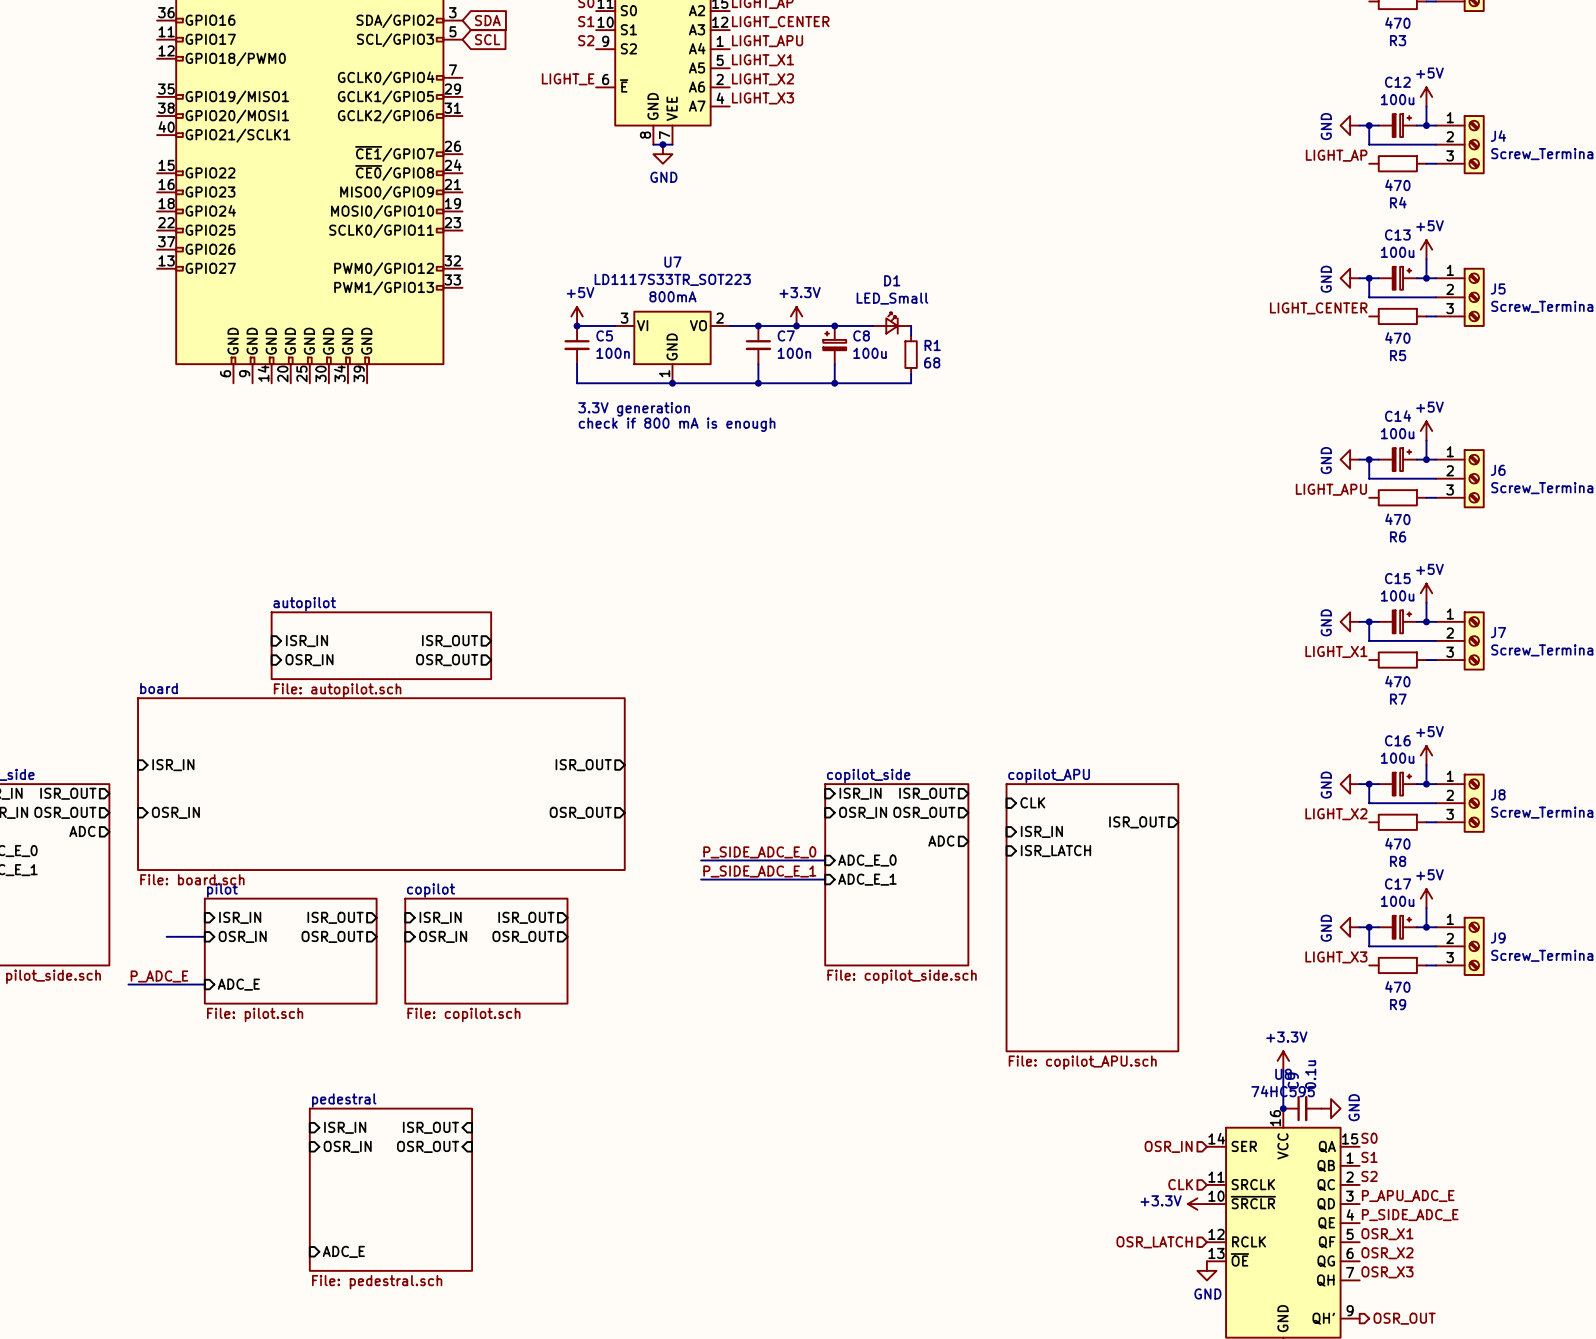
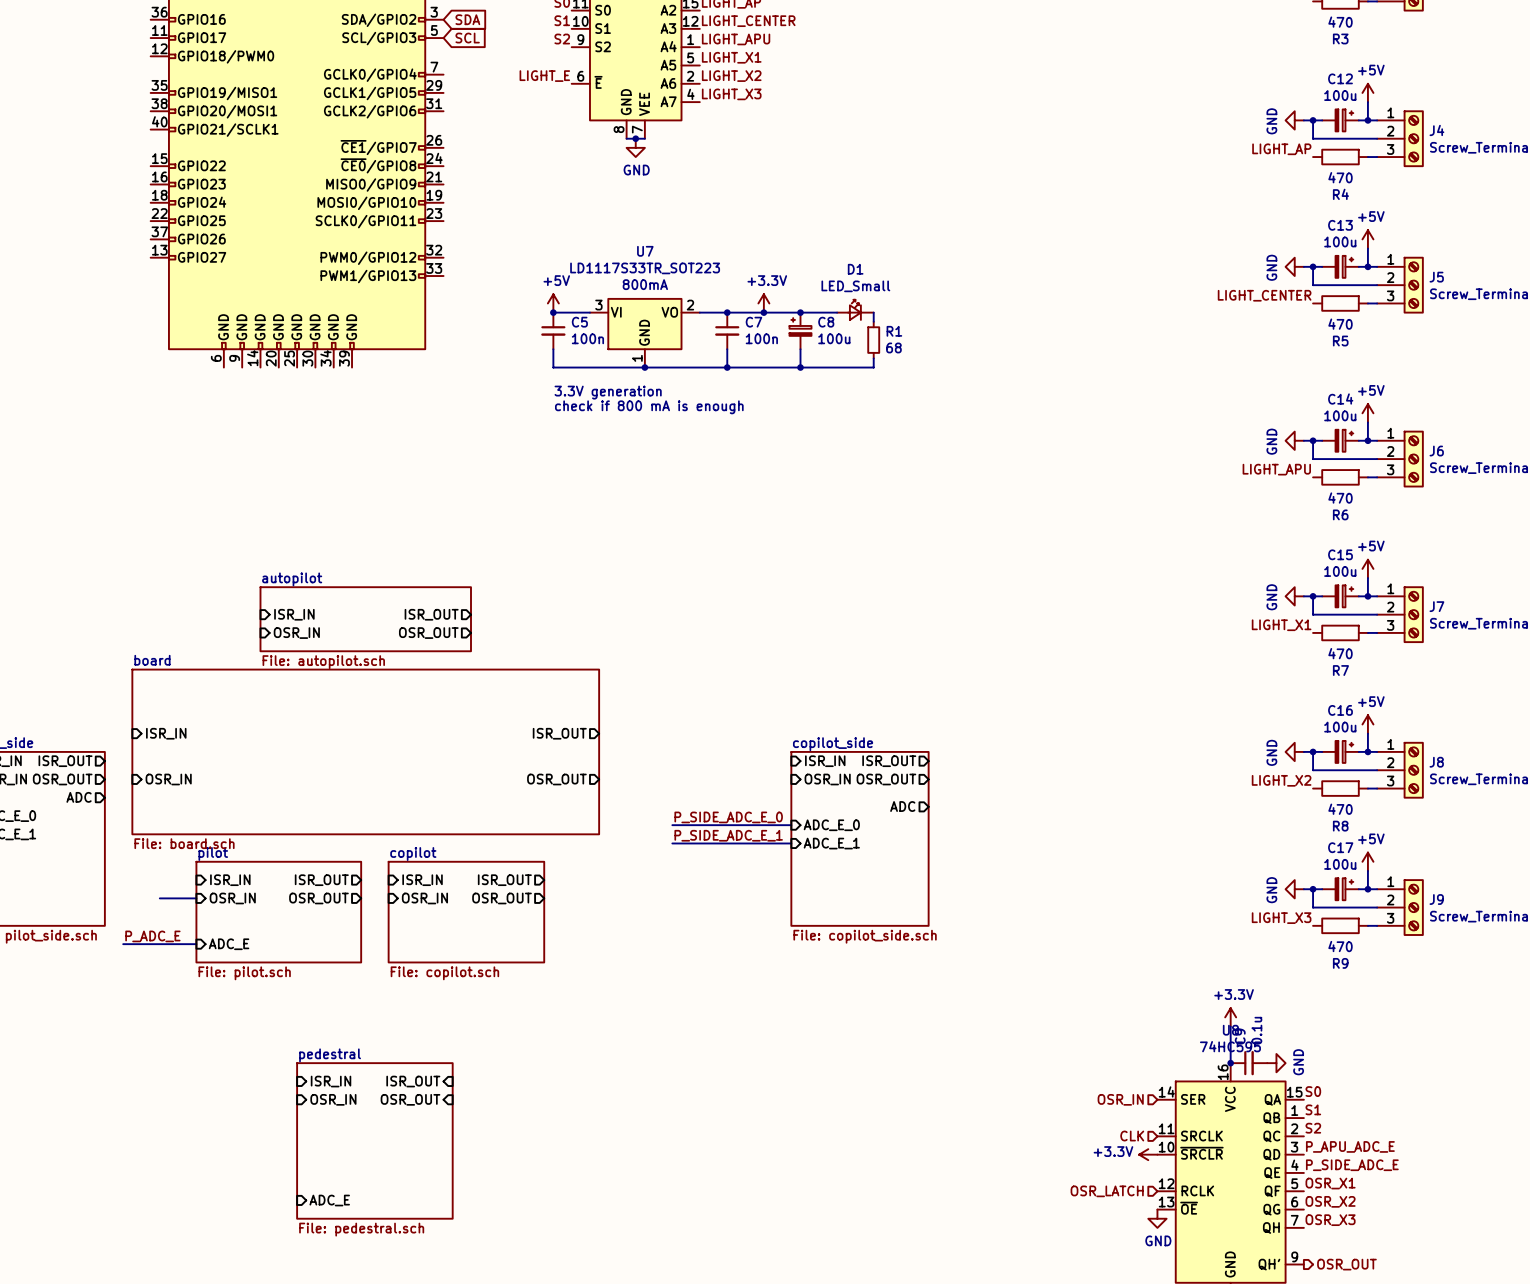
sheet pin: CLK (1032, 802) -> none
sheet pin: ISR_OUT (1137, 822) -> none
sheet pin: ISR_IN (1041, 831) -> none
sheet pin: ISR_LATCH (1055, 851) -> none
sheet copilot_APU: File: copilot_APU.sch (1092, 917) -> none

